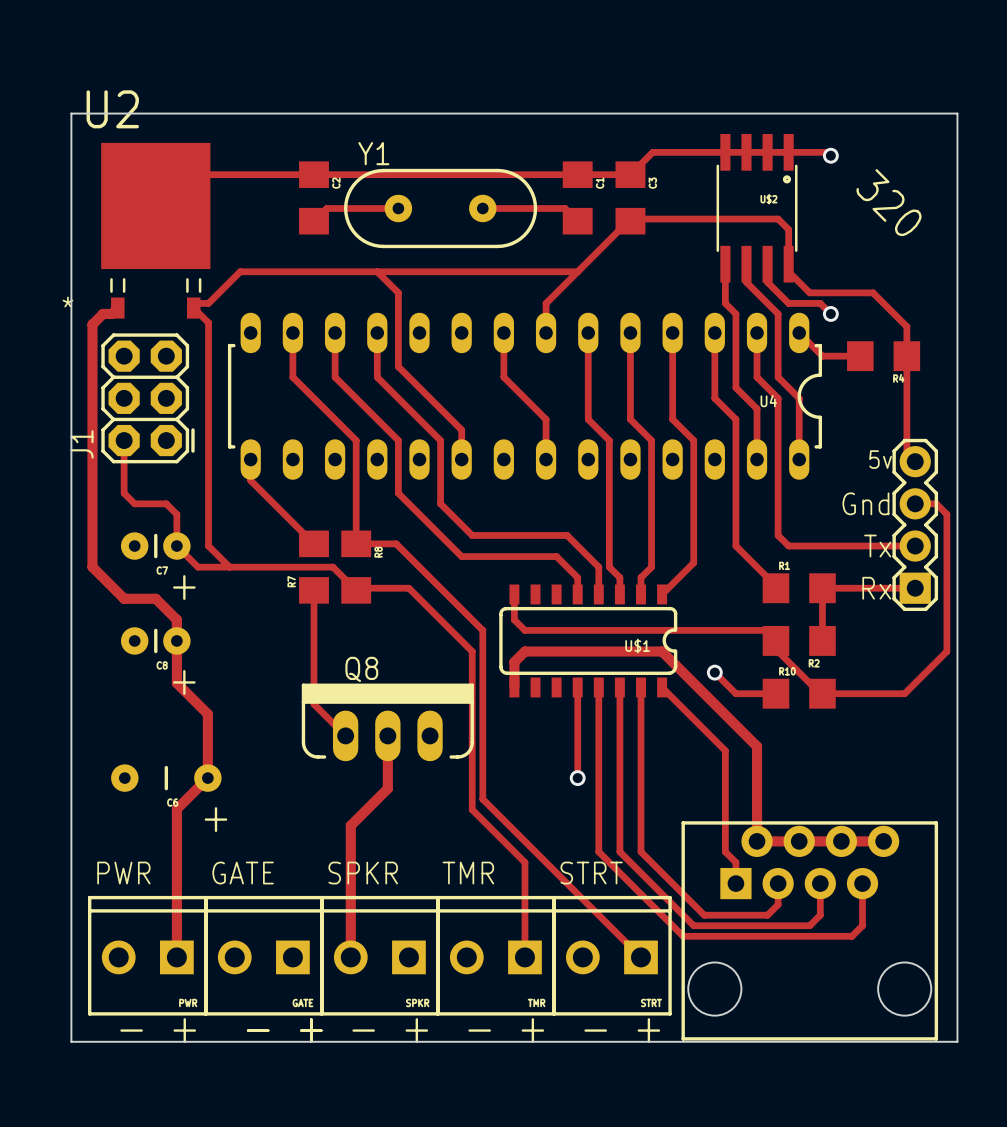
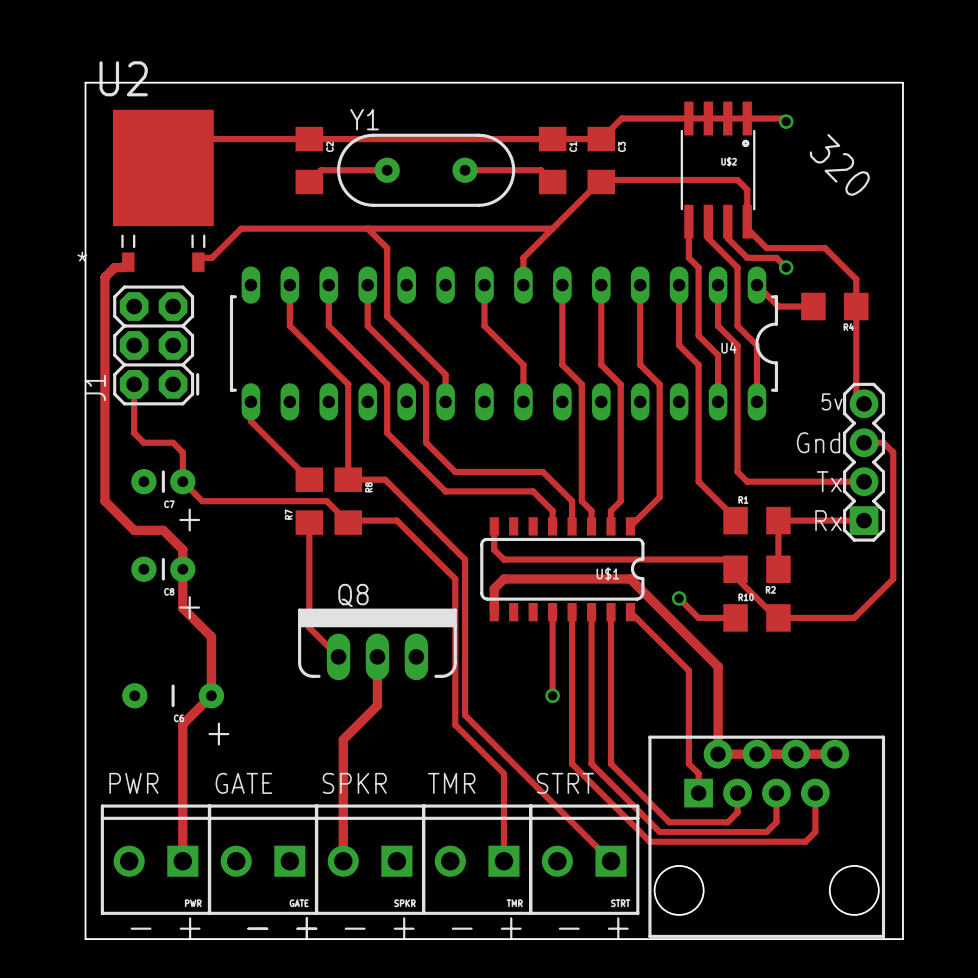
track: (193, 308) (208, 322) (208, 546) (229, 567) -> none

